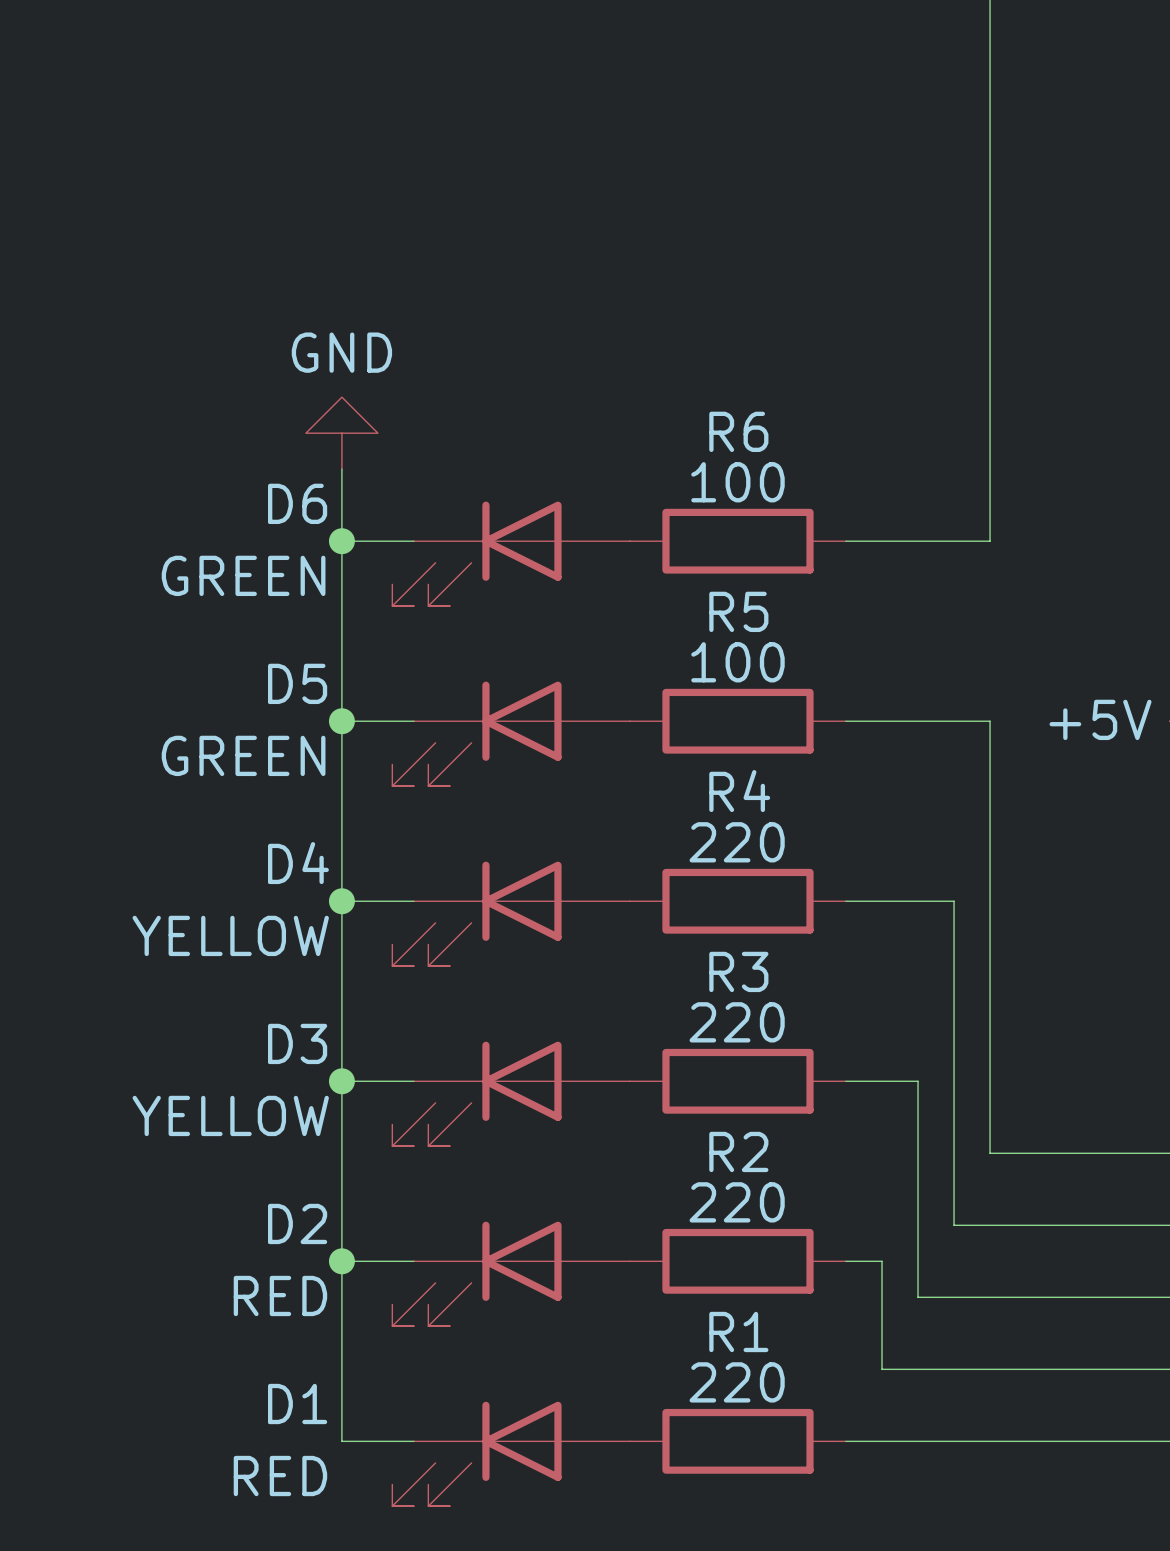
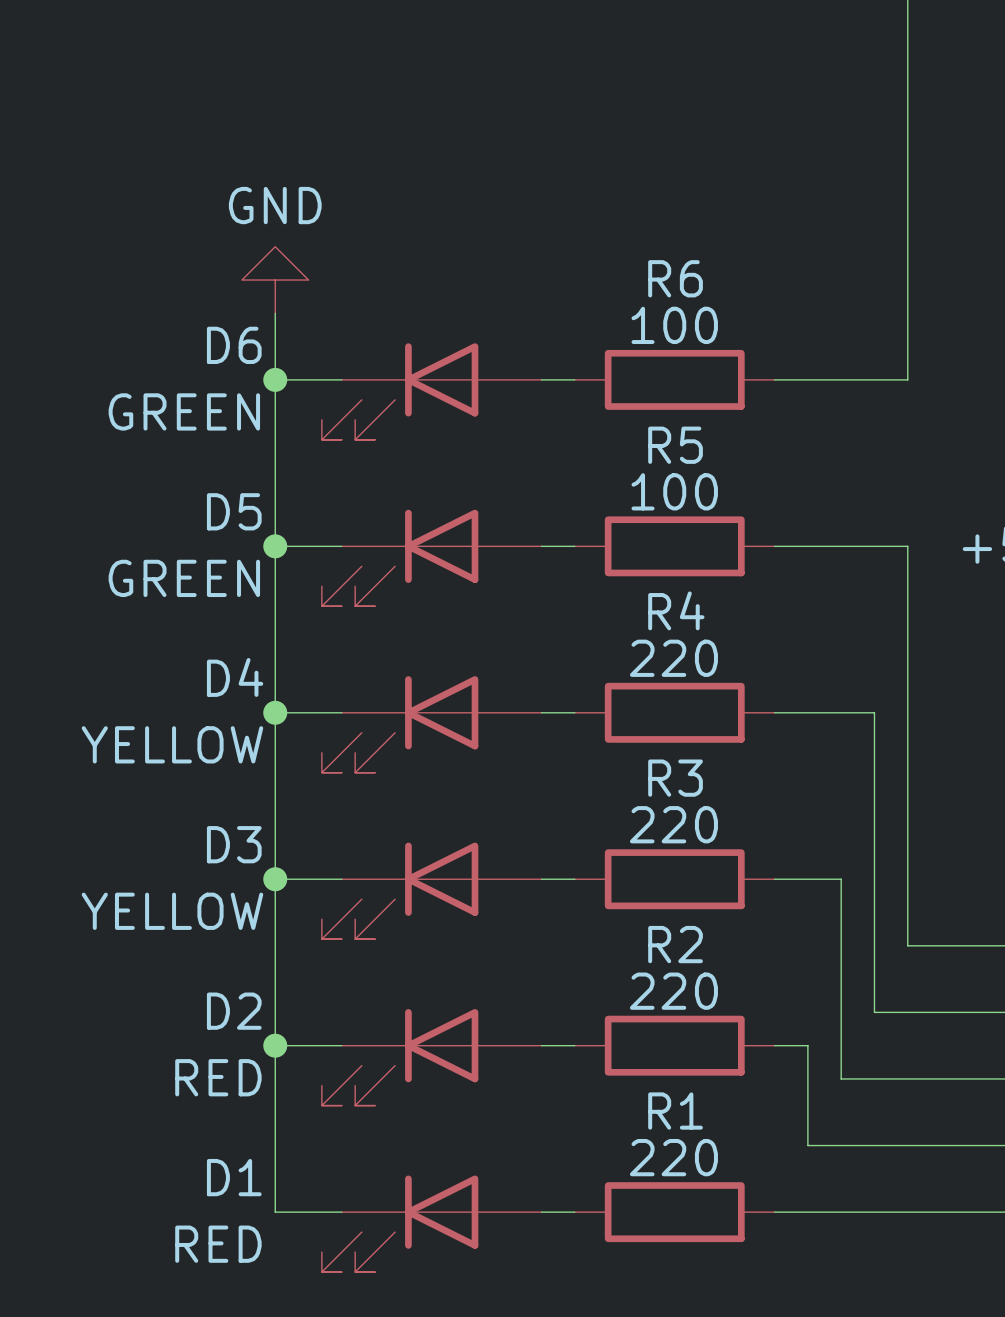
power symbol position: GND (341, 433) -> GND (275, 280)
wire: (341, 469) (341, 1441) -> (275, 313) (275, 1212) (308, 1212)
wire: none -> (275, 379) (308, 379)
junction position: (341, 541) -> (275, 379)
D6 position: (511, 553) -> (431, 391)
wire: none -> (275, 546) (308, 546)
junction position: (341, 721) -> (275, 546)
D5 position: (511, 733) -> (431, 557)
wire: none -> (275, 712) (308, 712)
junction position: (341, 901) -> (275, 712)
D4 position: (511, 913) -> (431, 724)
wire: none -> (275, 879) (308, 879)
junction position: (341, 1081) -> (275, 879)
D3 position: (511, 1093) -> (431, 890)
wire: none -> (275, 1045) (308, 1045)
junction position: (341, 1261) -> (275, 1045)
D2 position: (511, 1273) -> (431, 1057)
D1 position: (511, 1453) -> (431, 1223)

